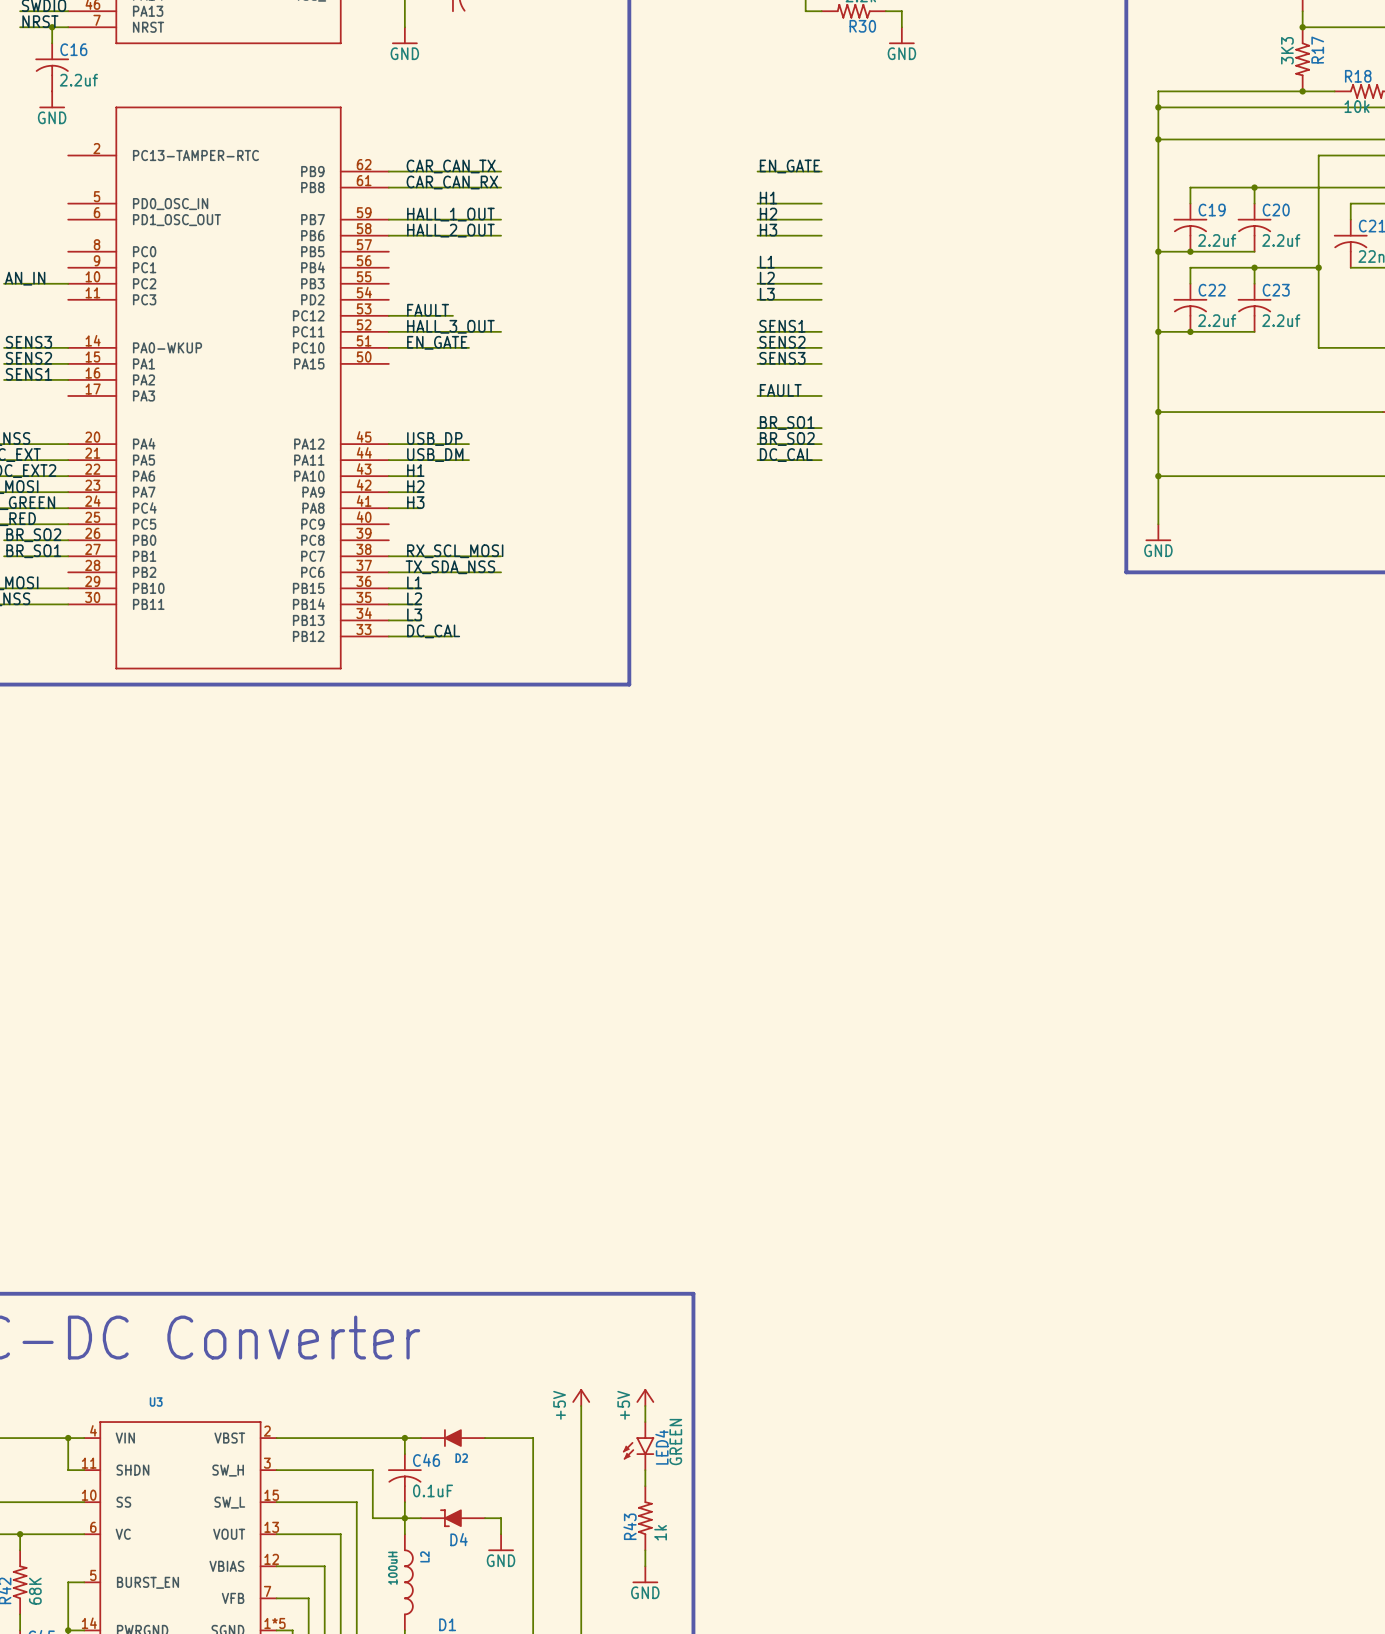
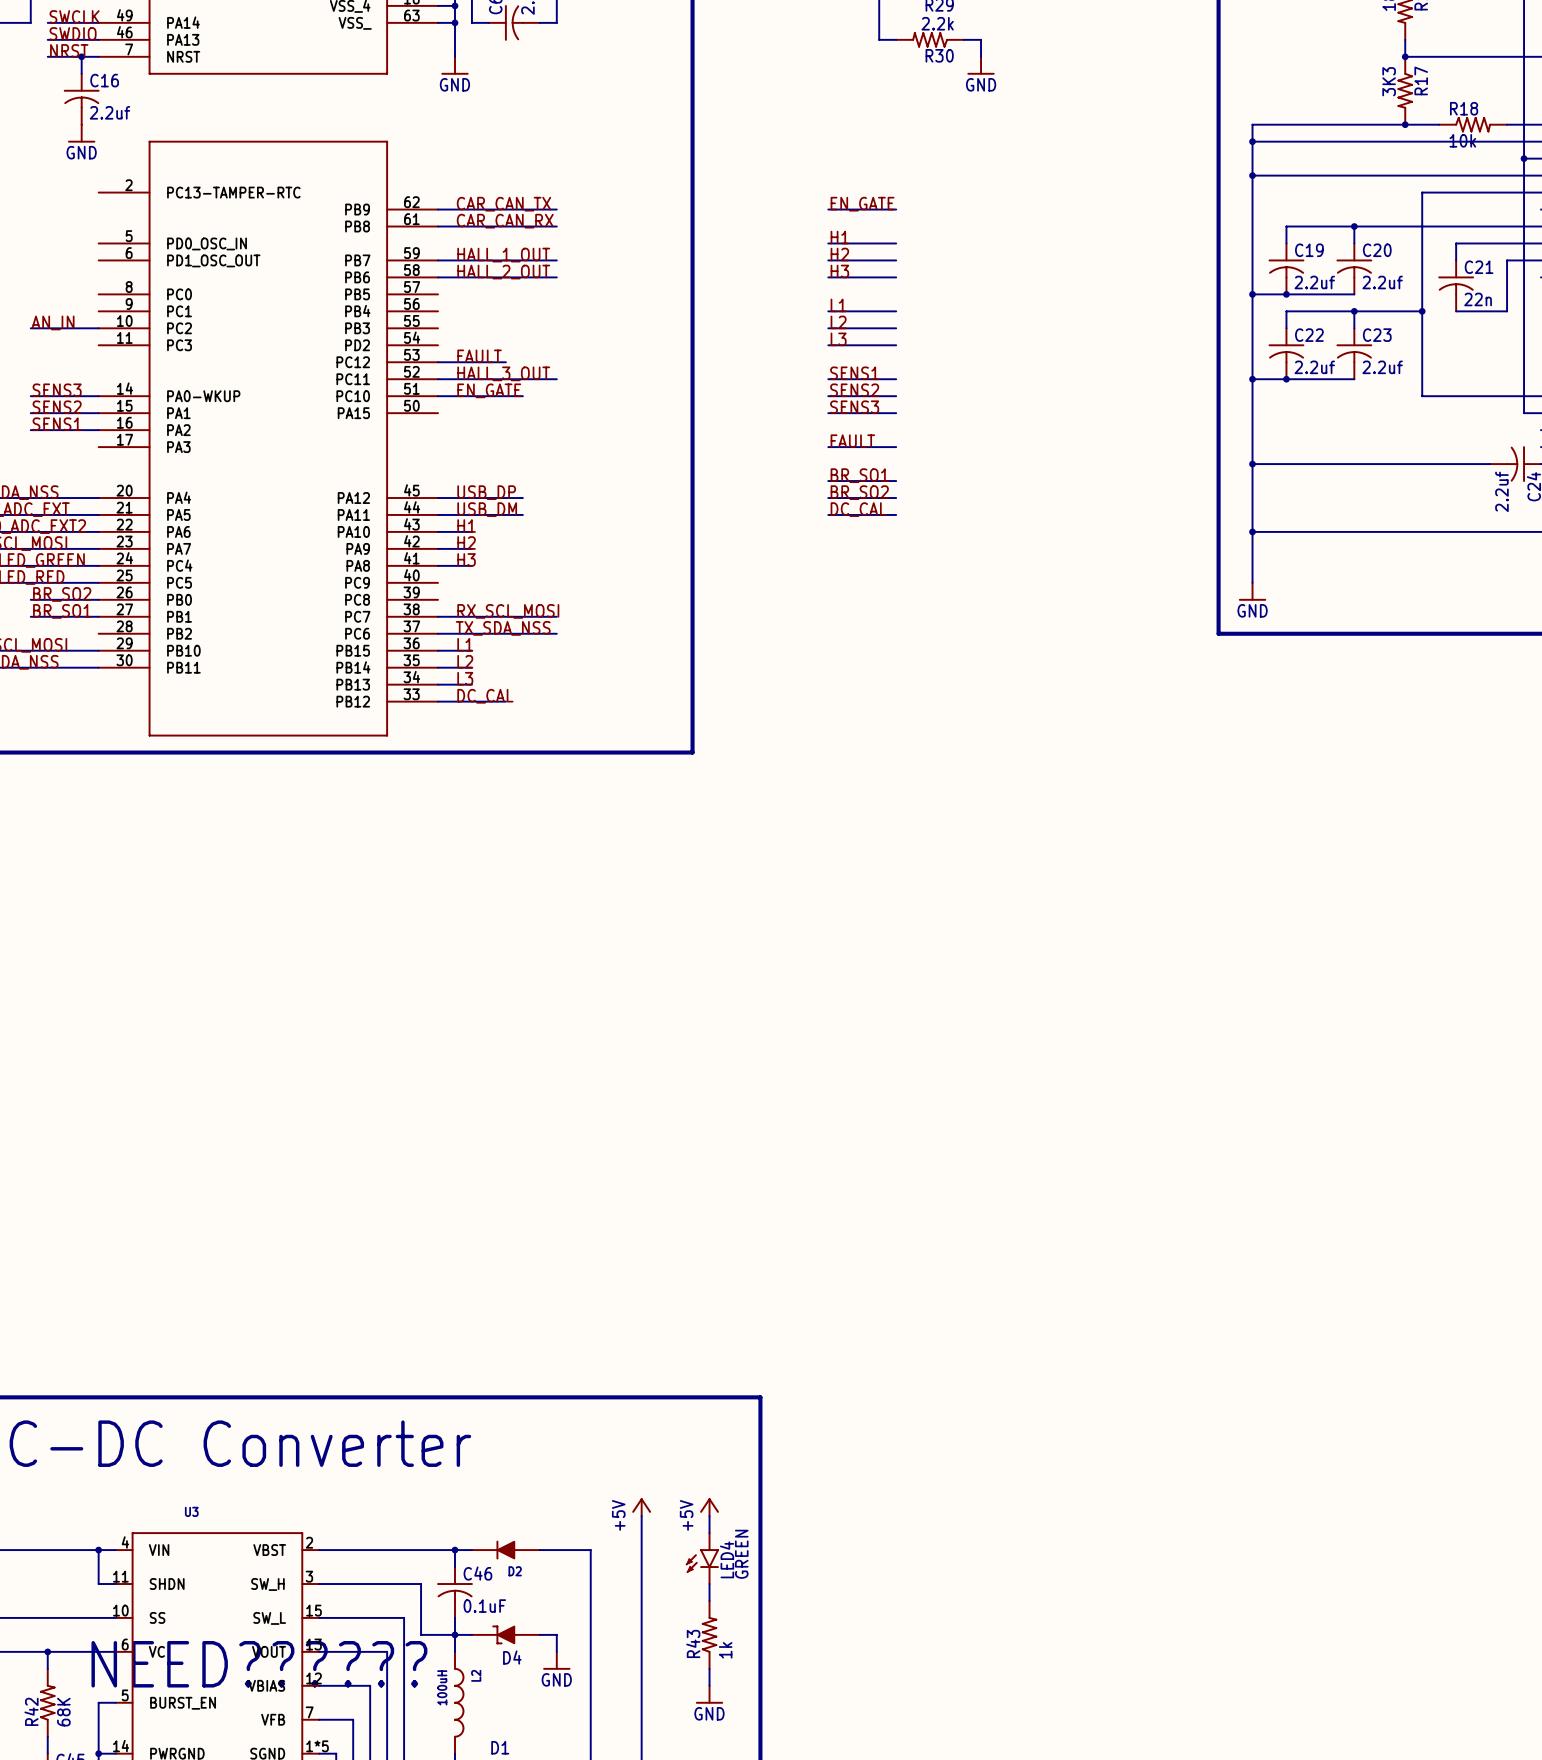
text: none -> NEED?????? (259, 1664)

